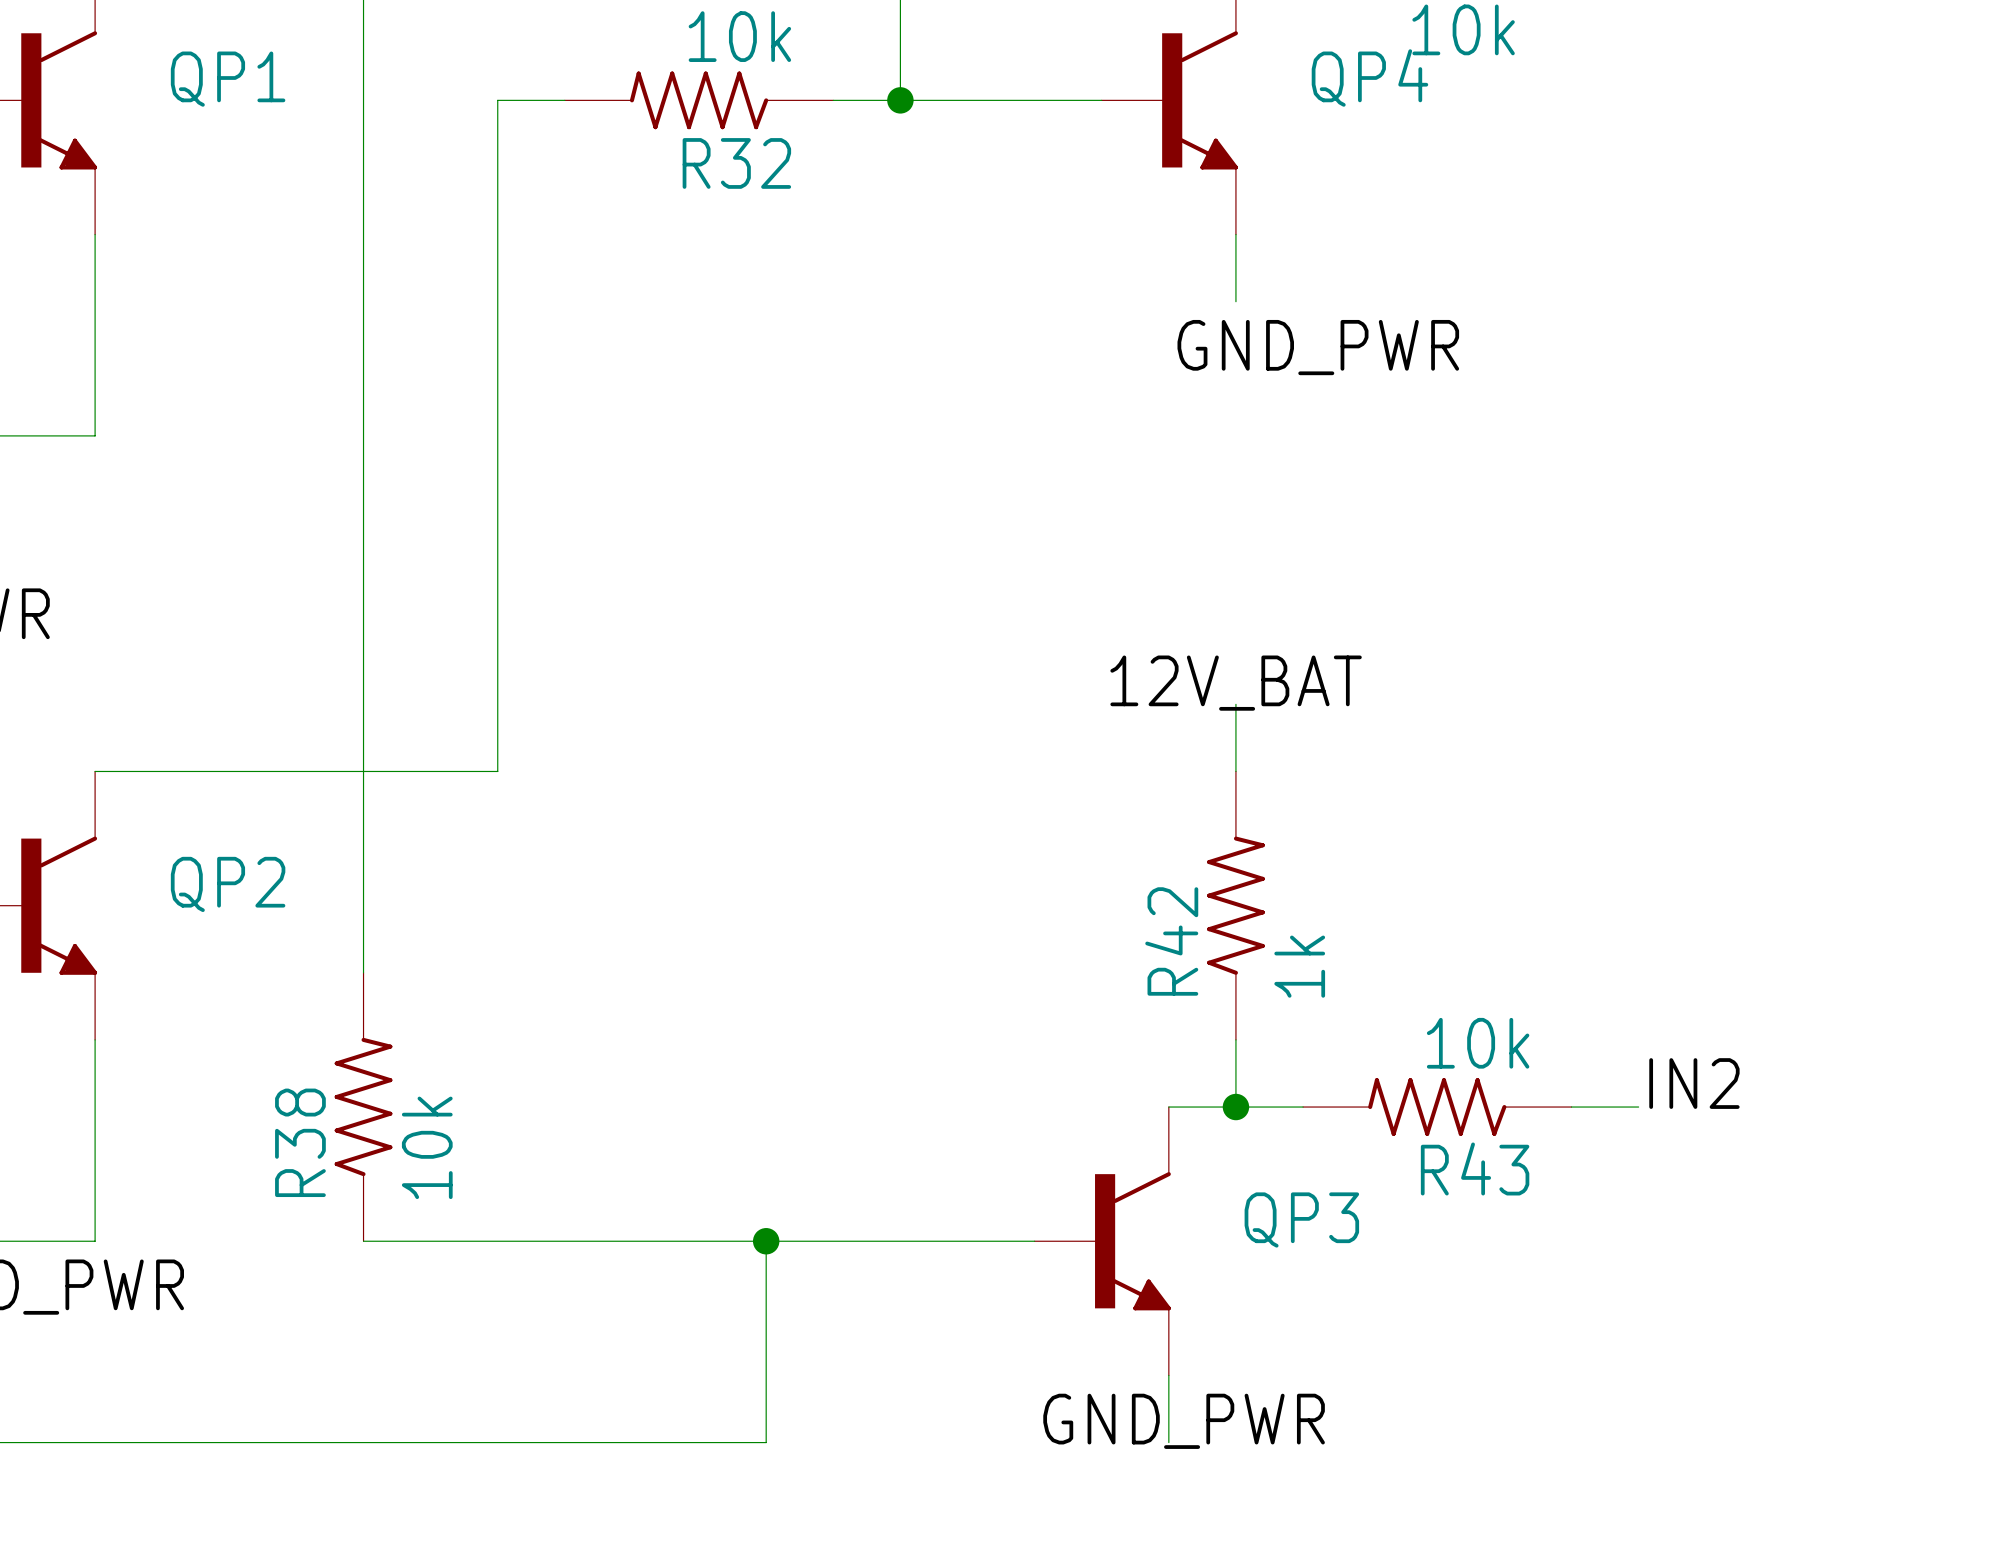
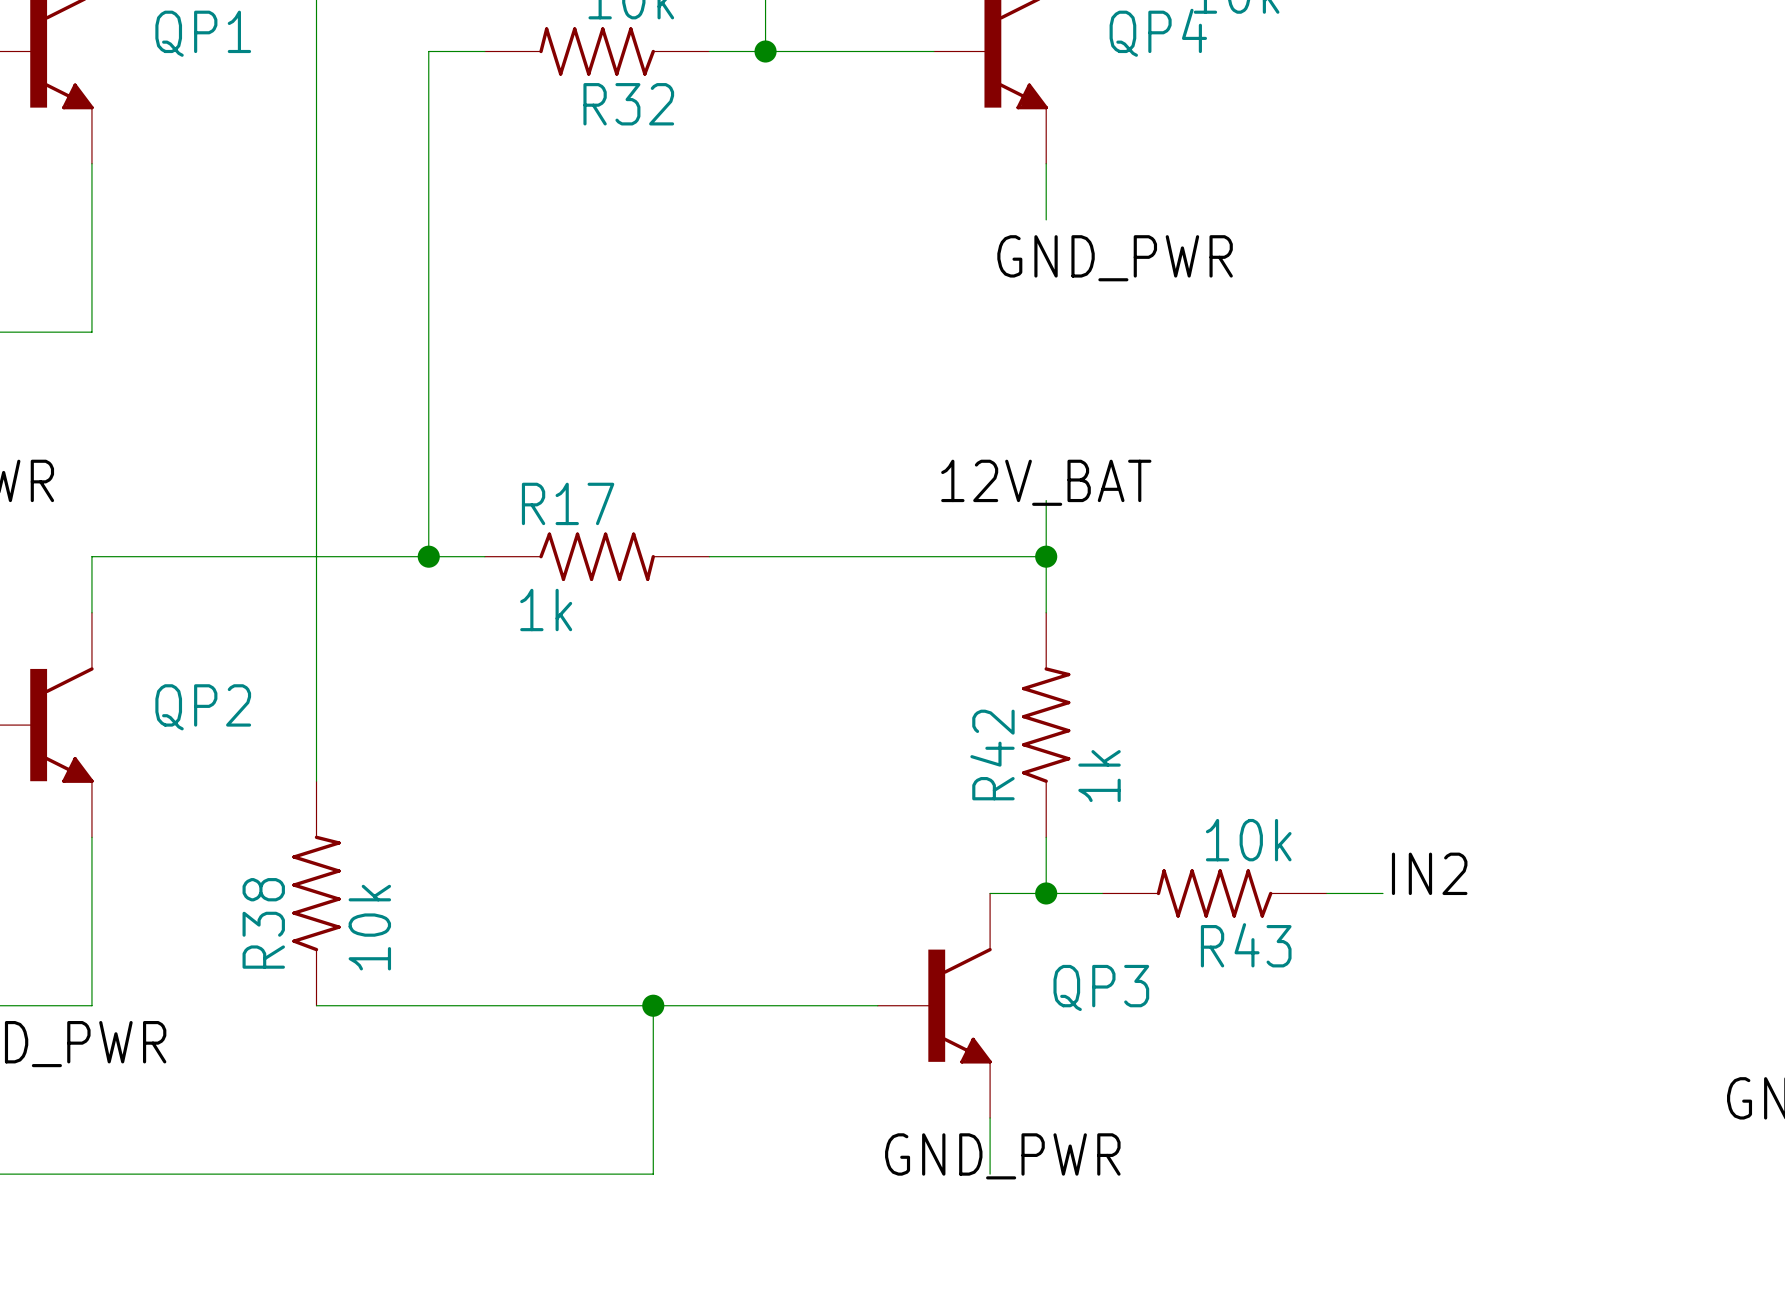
wire: none -> (1046, 500) (1046, 556) (709, 556)
label position: 12V_BAT (1236, 683) -> 12V_BAT (1046, 482)
wire: (497, 704) (497, 771) (95, 771) -> (484, 556) (91, 556) (91, 612)
junction: none -> (428, 556)
R17: none -> 1k (597, 556)
junction: none -> (1046, 556)

